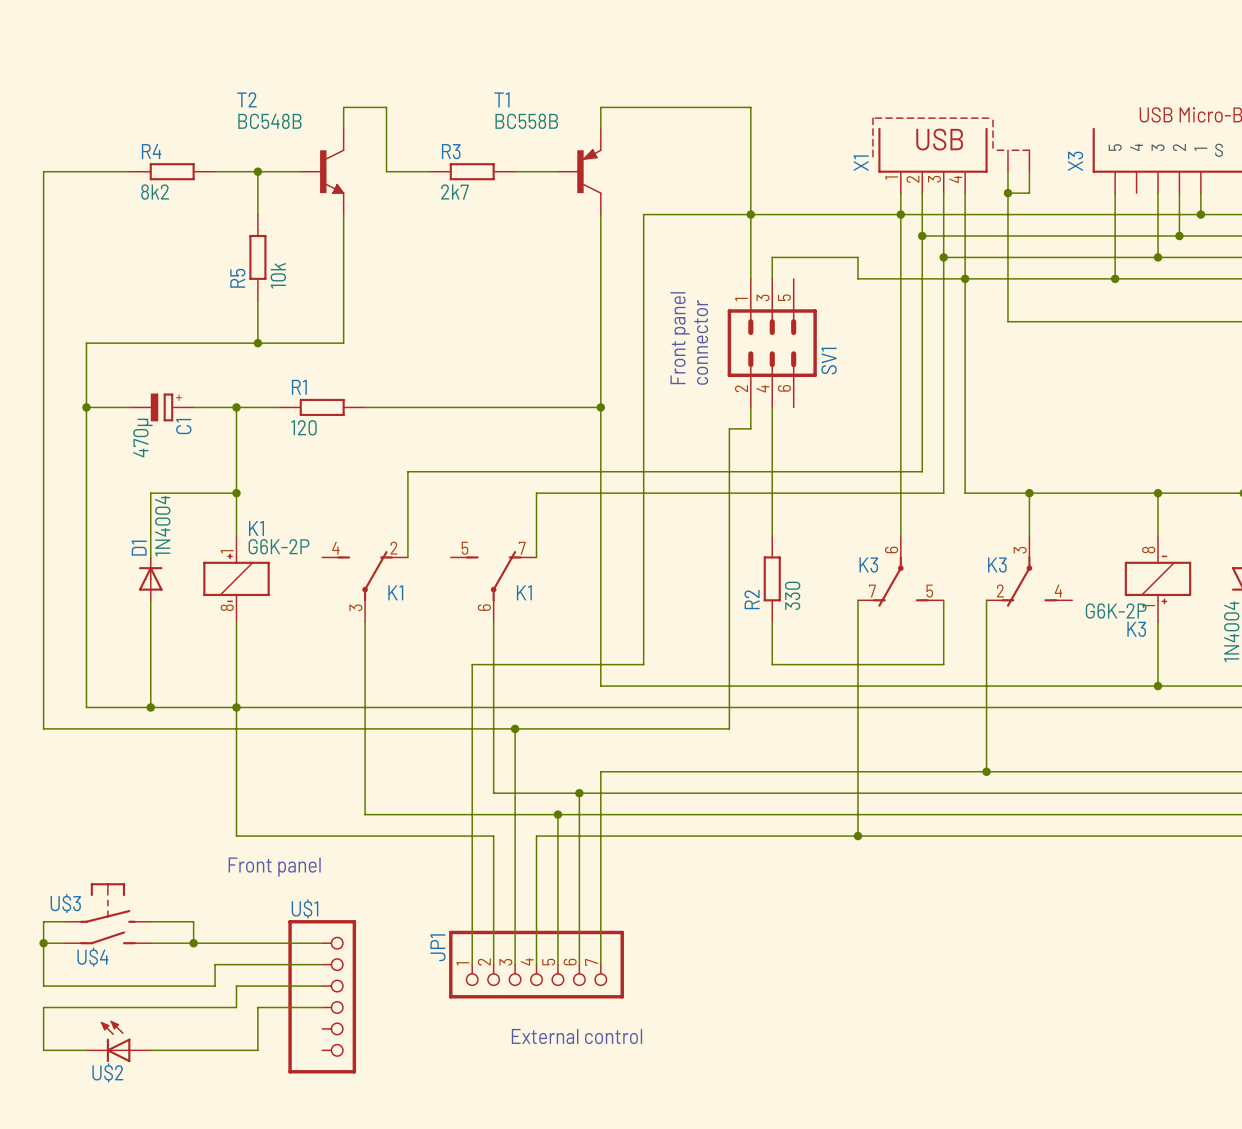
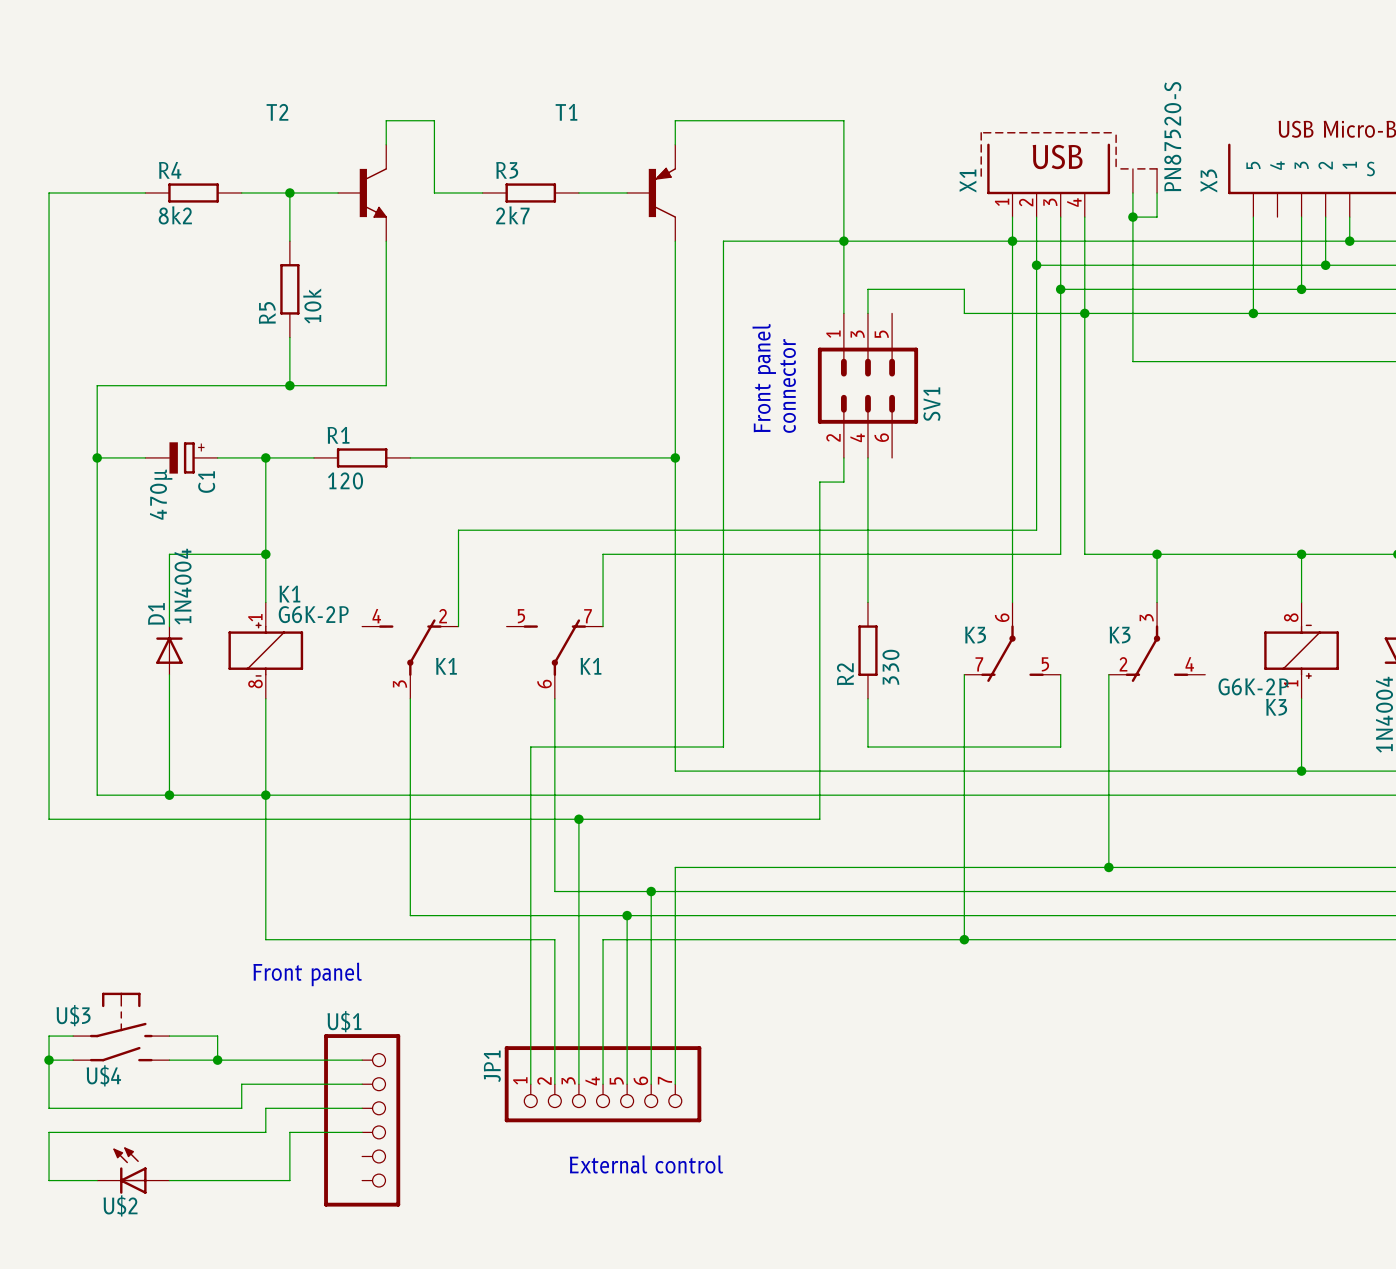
T2 value: BC548B (269, 121) -> none
T1 value: BC558B (526, 121) -> none
X1 value: none -> PN87520-S (1172, 136)

